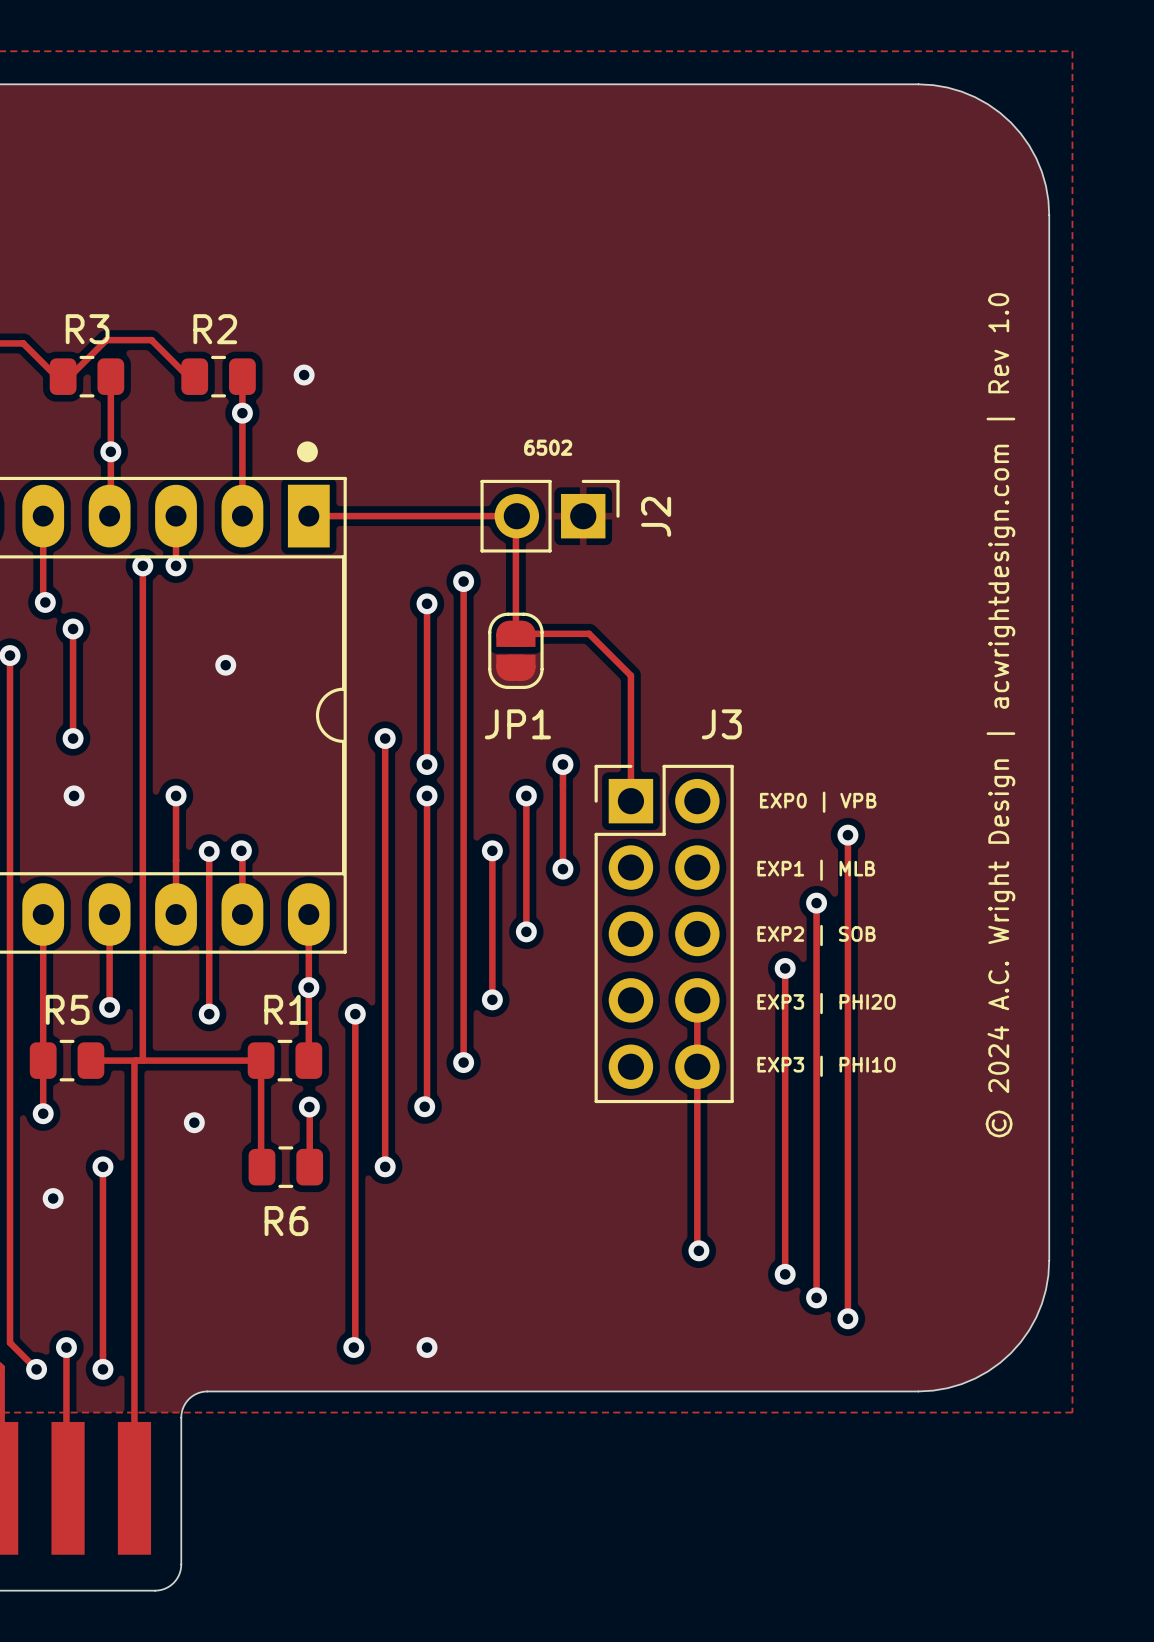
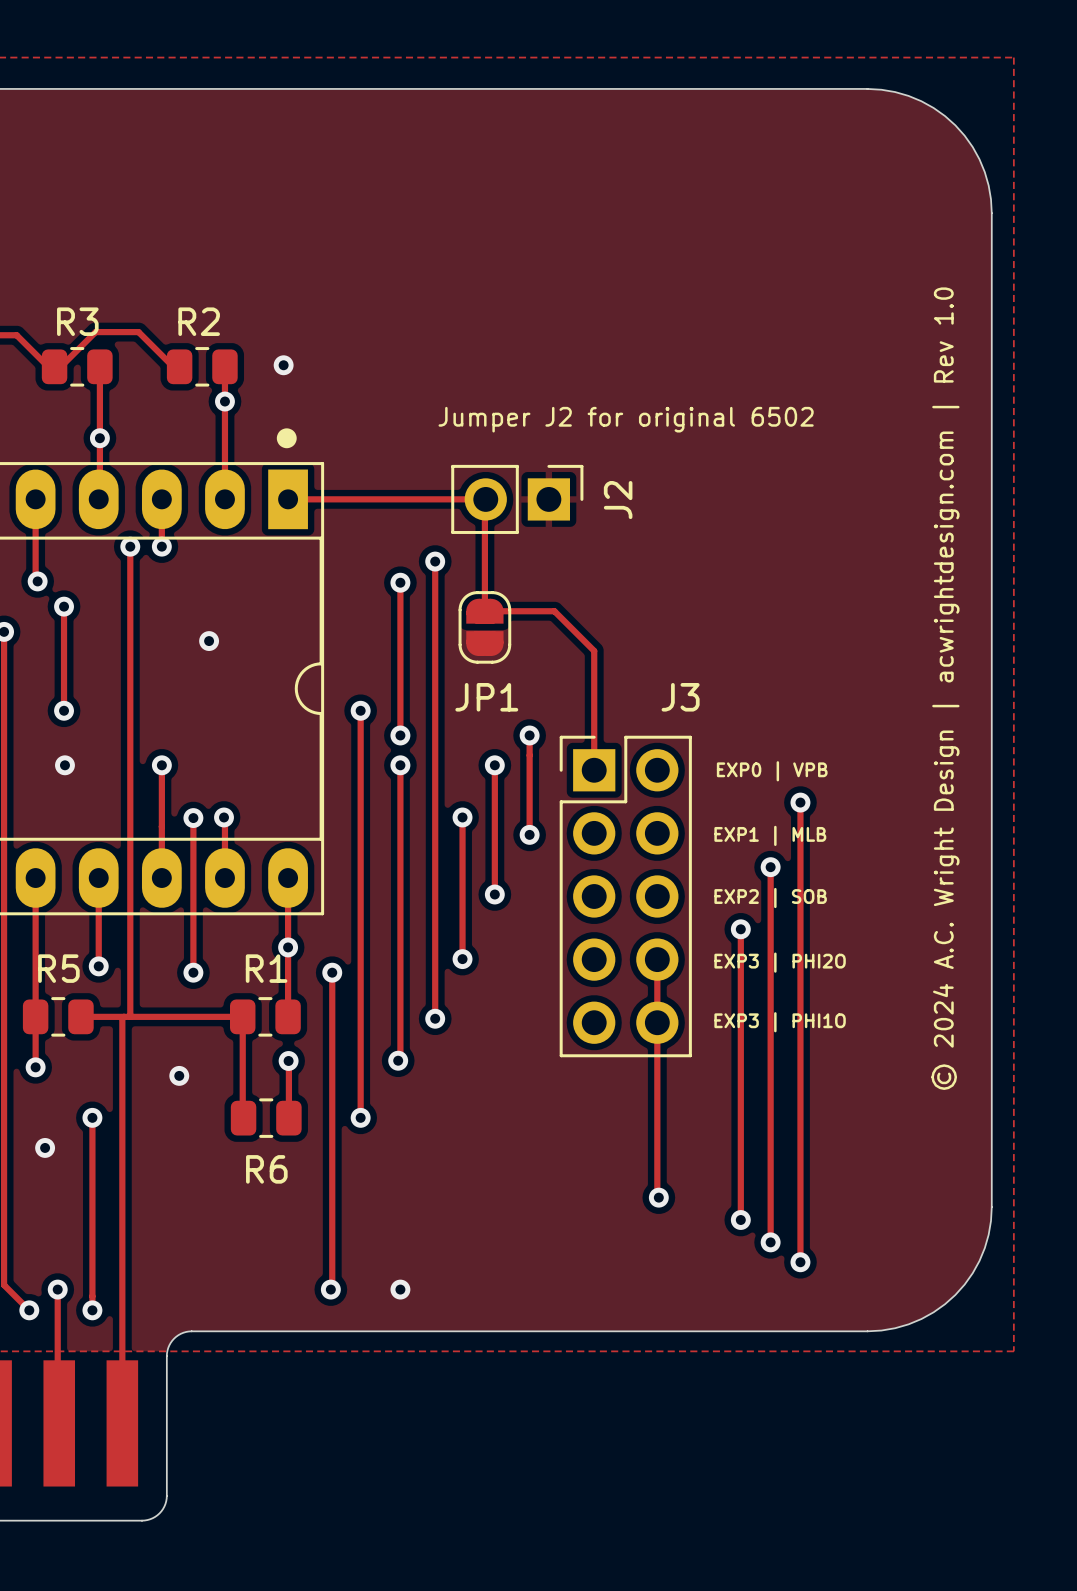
text: none -> Jumper J2 for original 6502 (626, 419)
text: 6502 (548, 447) -> none

